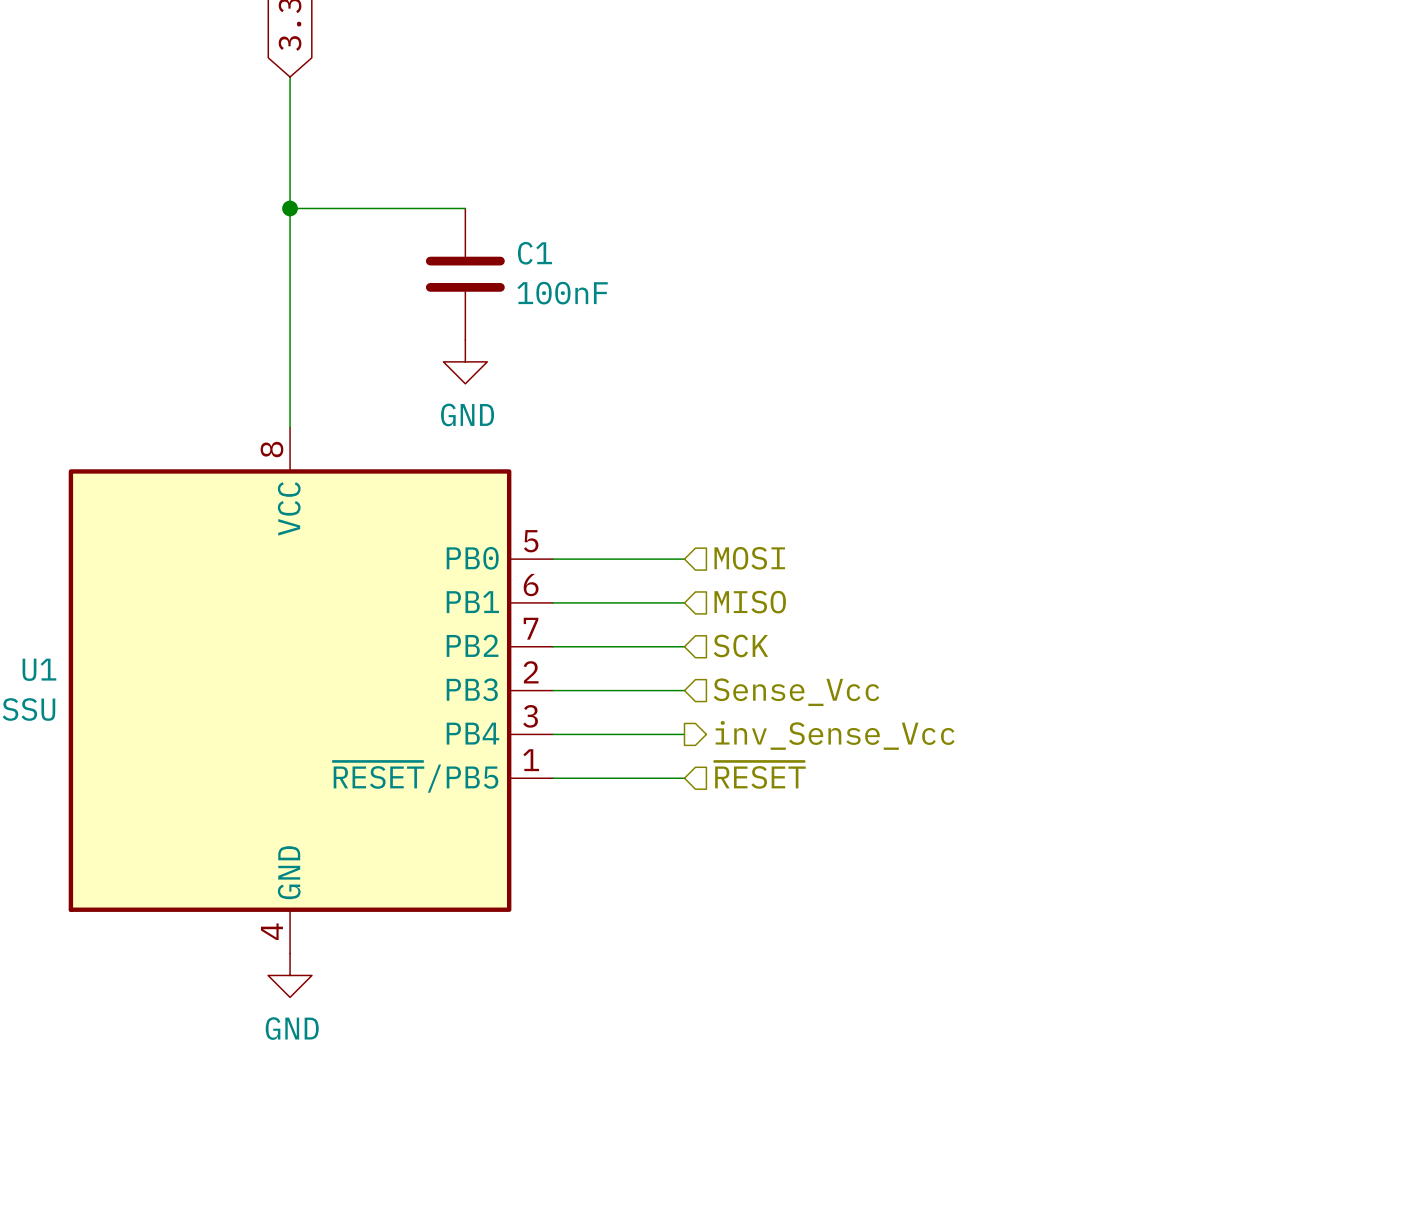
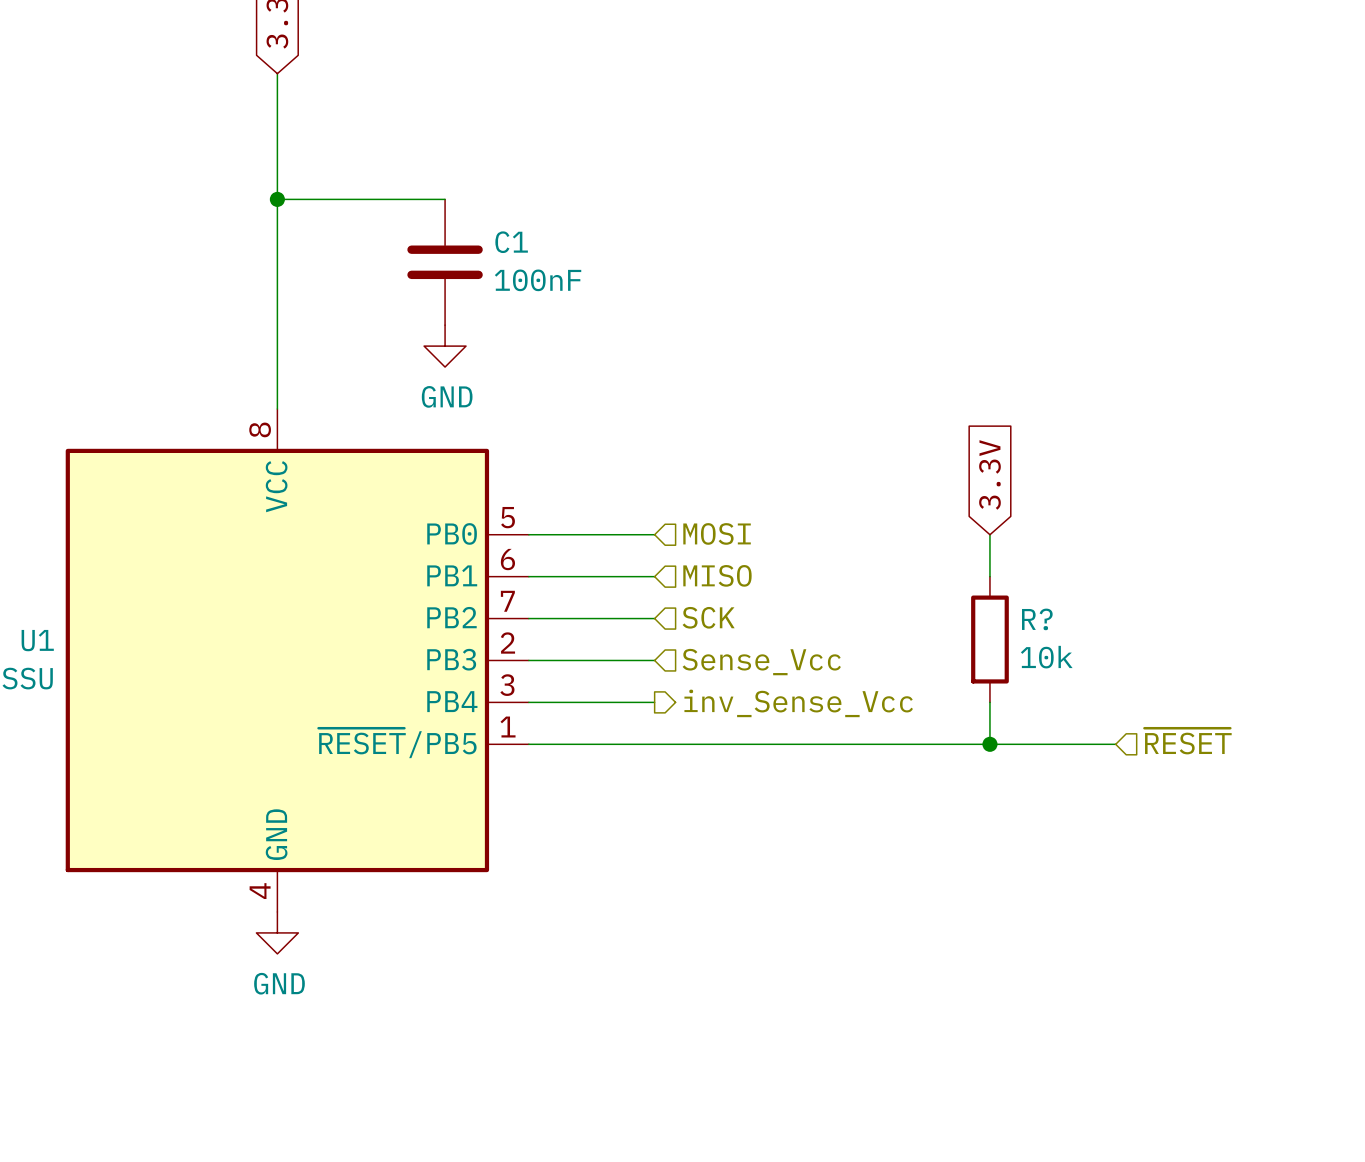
global label: none -> 3.3V (989, 474)
wire: none -> (989, 534) (989, 576)
R?: none -> 10k (989, 639)
wire: none -> (989, 702) (989, 744)
hierarchical label: ~{RESET} (760, 775) -> none
hierarchical label: none -> ~{RESET} (1188, 741)
wire: none -> (654, 744) (1115, 744)
junction: none -> (989, 744)

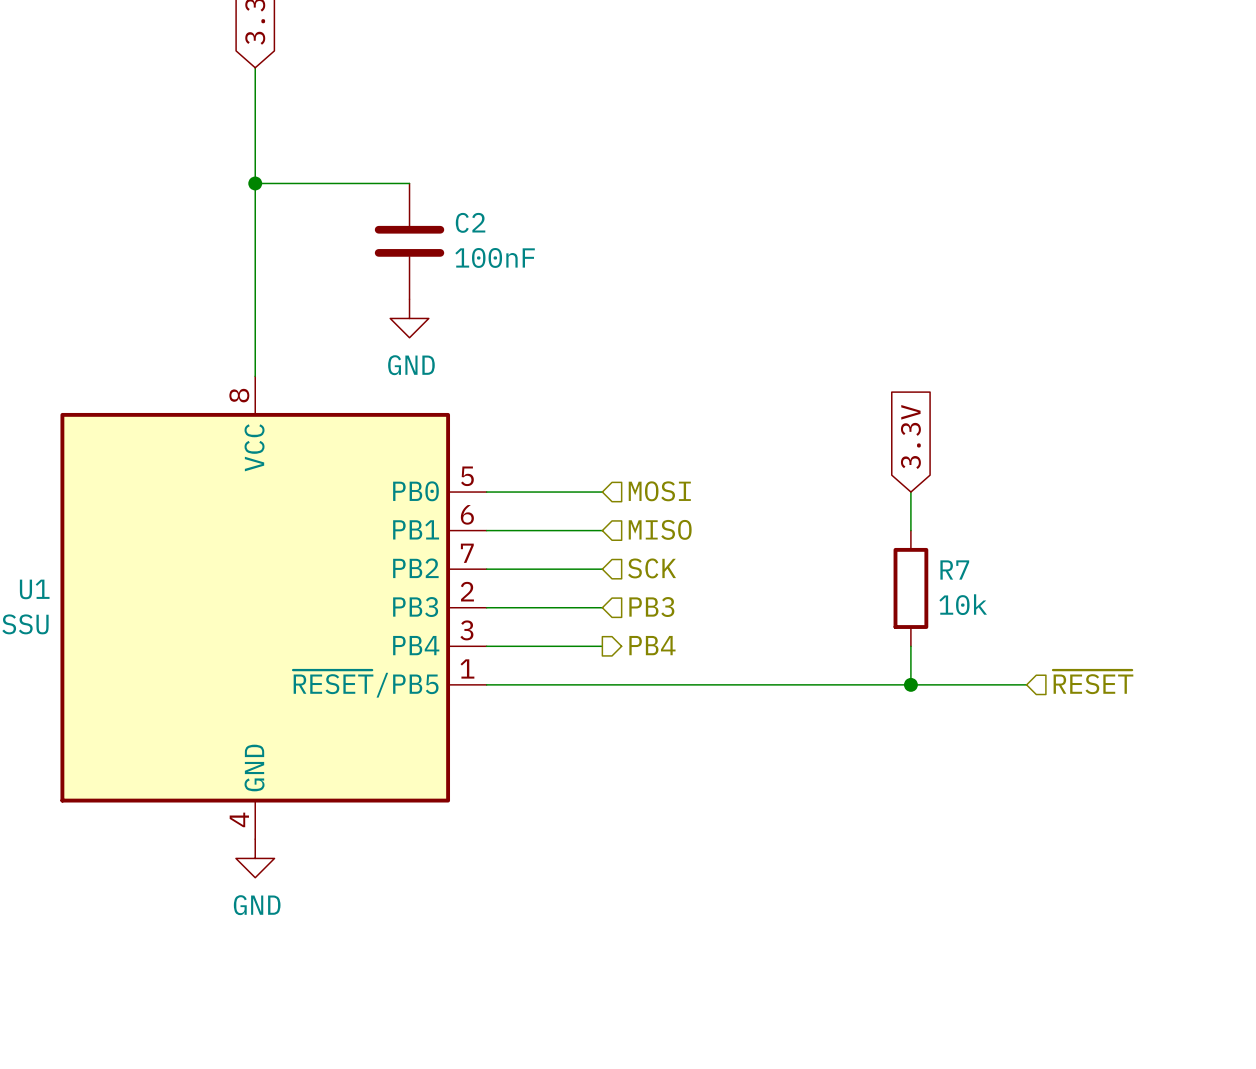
C1 name: C1 (511, 242) -> C2 (470, 222)
R? name: R? (1037, 619) -> R7 (954, 569)
hierarchical label: Sense_Vcc (761, 662) -> PB3 (651, 607)
hierarchical label: inv_Sense_Vcc (798, 703) -> PB4 (652, 645)

